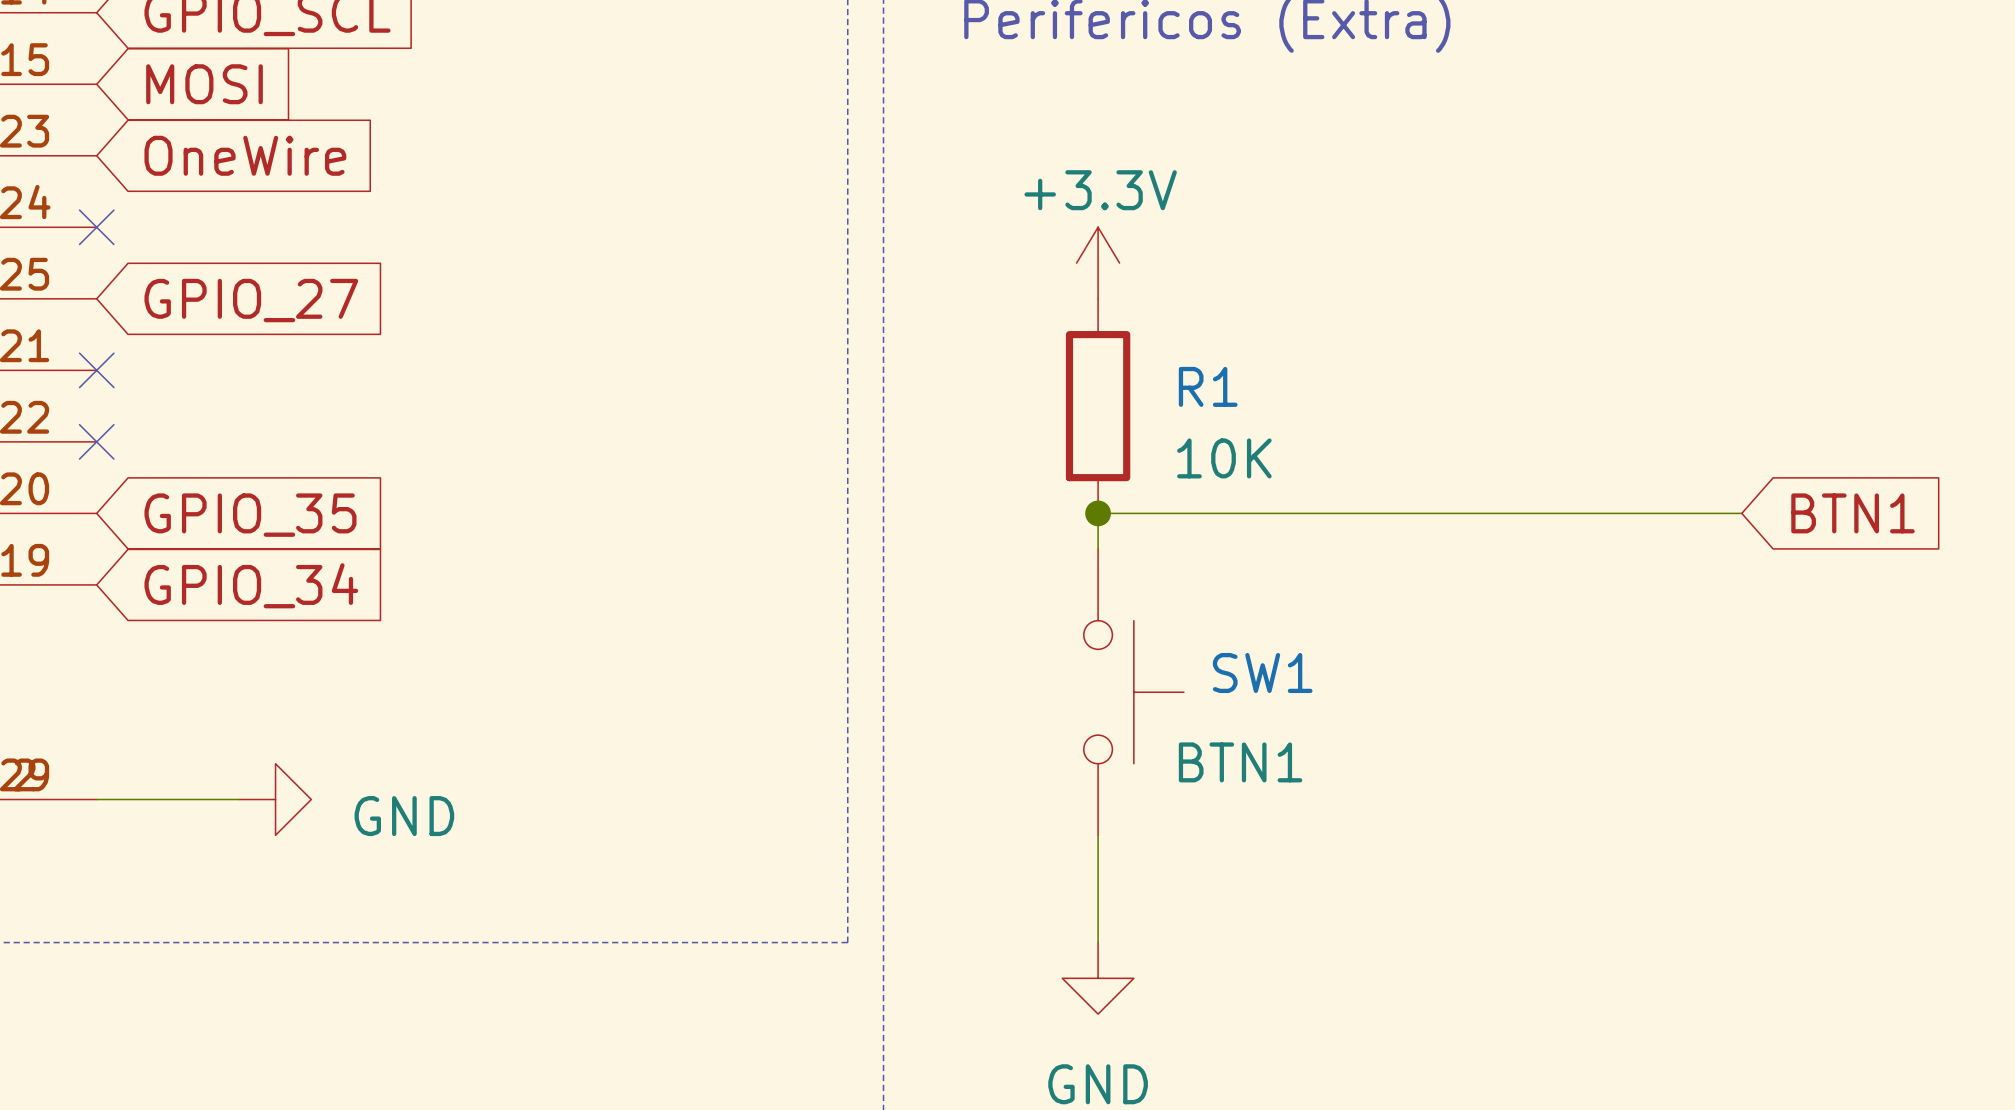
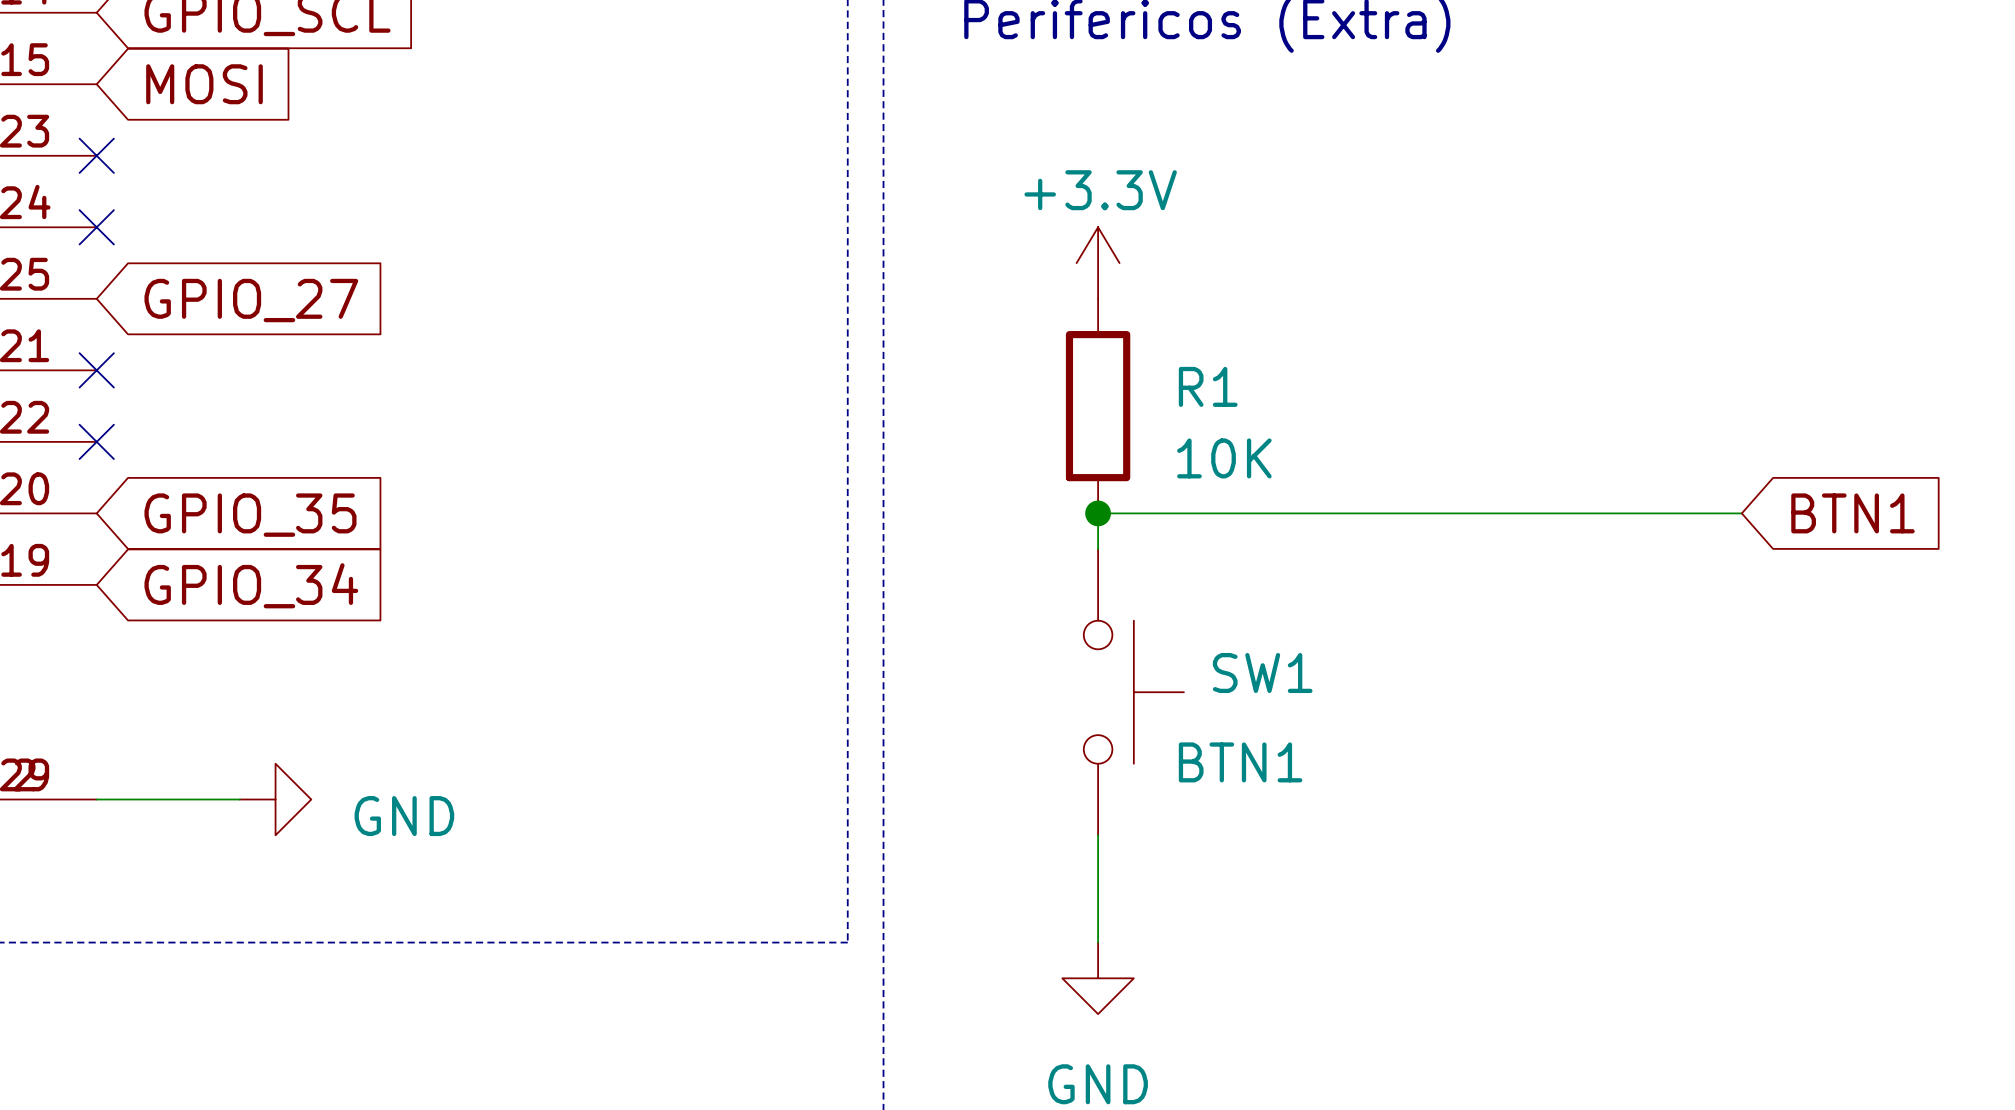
no-connect mark: none -> (96, 155)
global label: OneWire (245, 155) -> none

